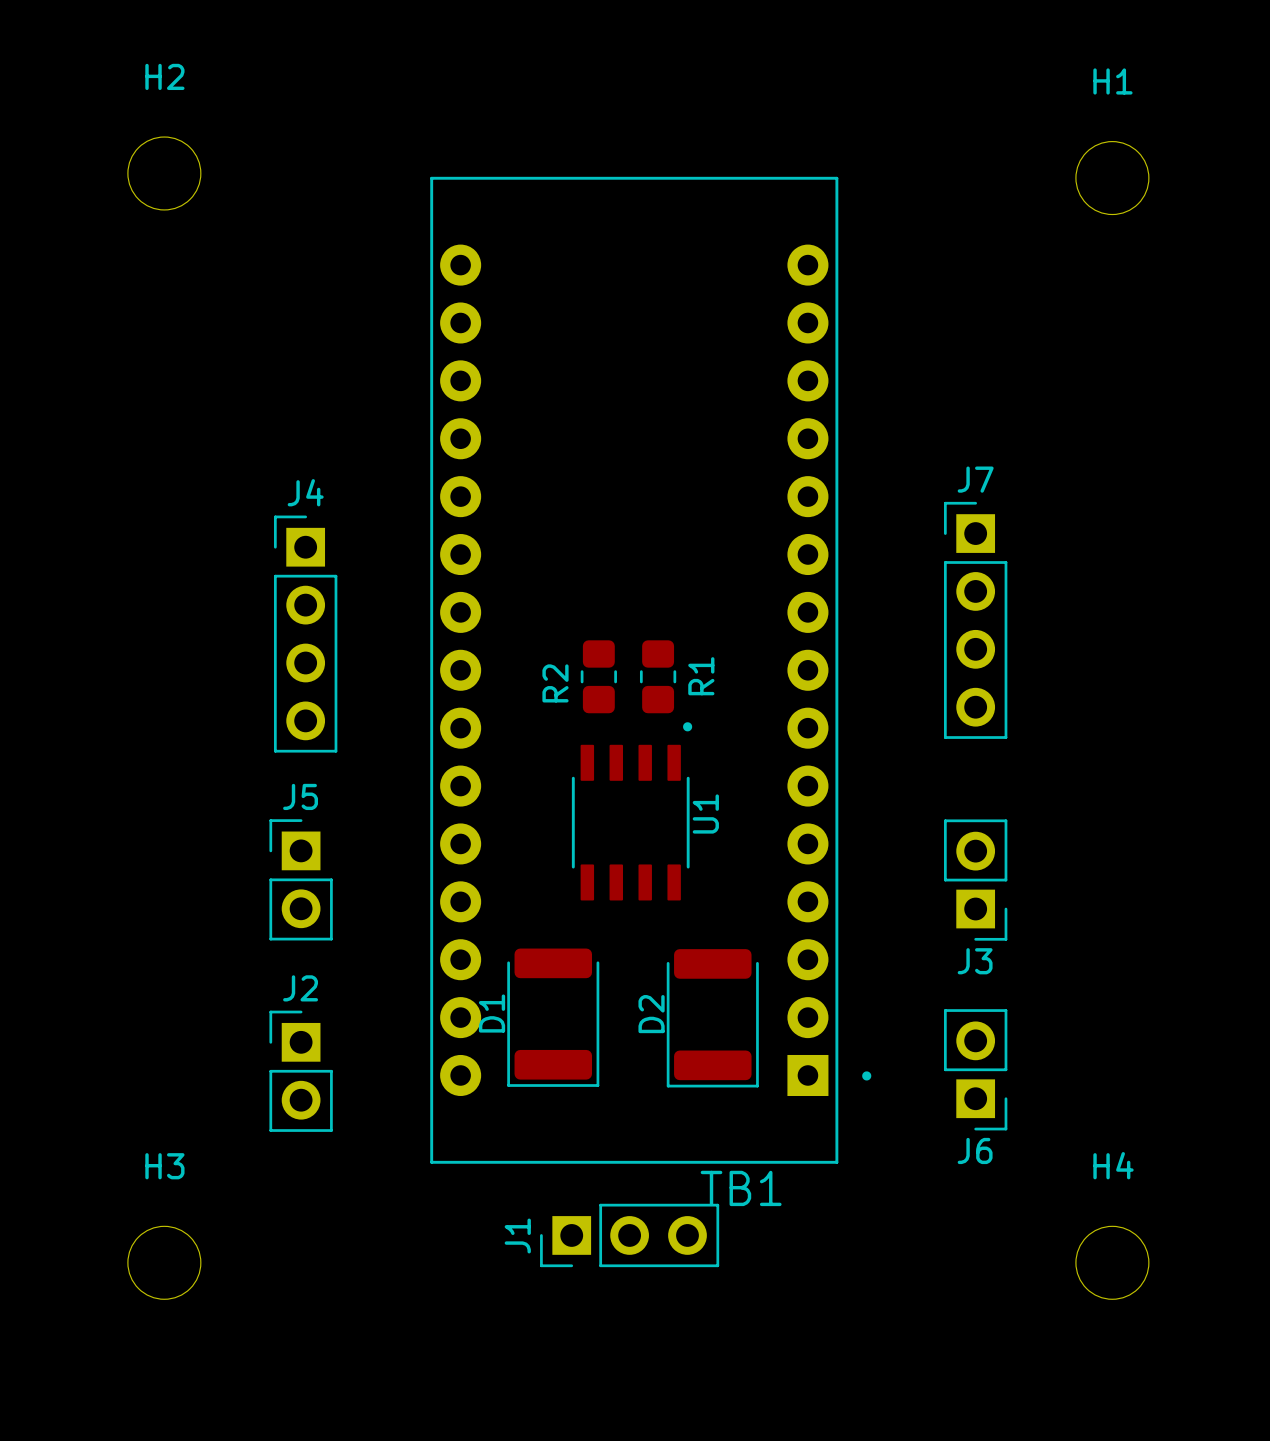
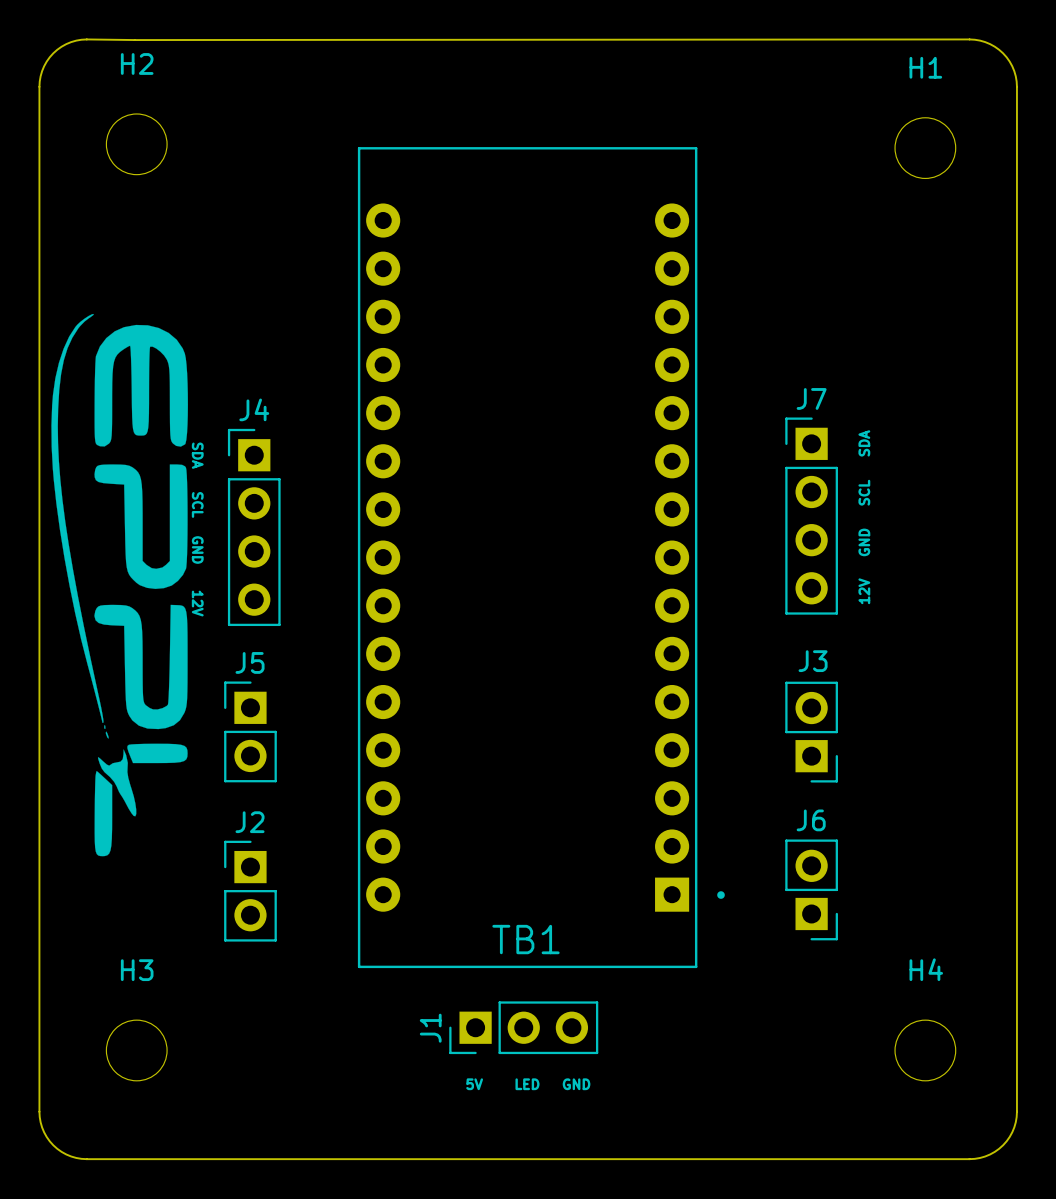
board edge: none -> (86, 39) (969, 39) (990, 44) (1006, 57) (1014, 71) (1016, 86) (1016, 1111) (1012, 1132) (999, 1148) (985, 1156) (969, 1159) (86, 1159) (66, 1154) (49, 1141) (42, 1127) (39, 1111) (39, 86) (42, 71) (53, 53) (66, 44) (86, 39)
drawing: none -> [51, 313, 188, 857]
text: none -> SDA (864, 443)
text: none -> SDA (197, 455)
text: none -> SCL (864, 492)
text: none -> SCL (197, 504)
text: none -> GND (864, 542)
text: none -> GND (197, 550)
R2: (598, 676) -> none
R1: (658, 676) -> none
text: none -> 12V (864, 591)
text: none -> 12V (197, 603)
U1: (632, 811) -> none
J3 name position: J3 (975, 961) -> J3 (813, 661)
D1: (553, 1017) -> none
D2: (712, 1018) -> none
J6 name position: J6 (975, 1150) -> J6 (811, 820)
TB1 name position: TB1 (741, 1188) -> TB1 (525, 939)
text: none -> 5V (474, 1084)
text: none -> LED (527, 1084)
text: none -> GND (576, 1084)

